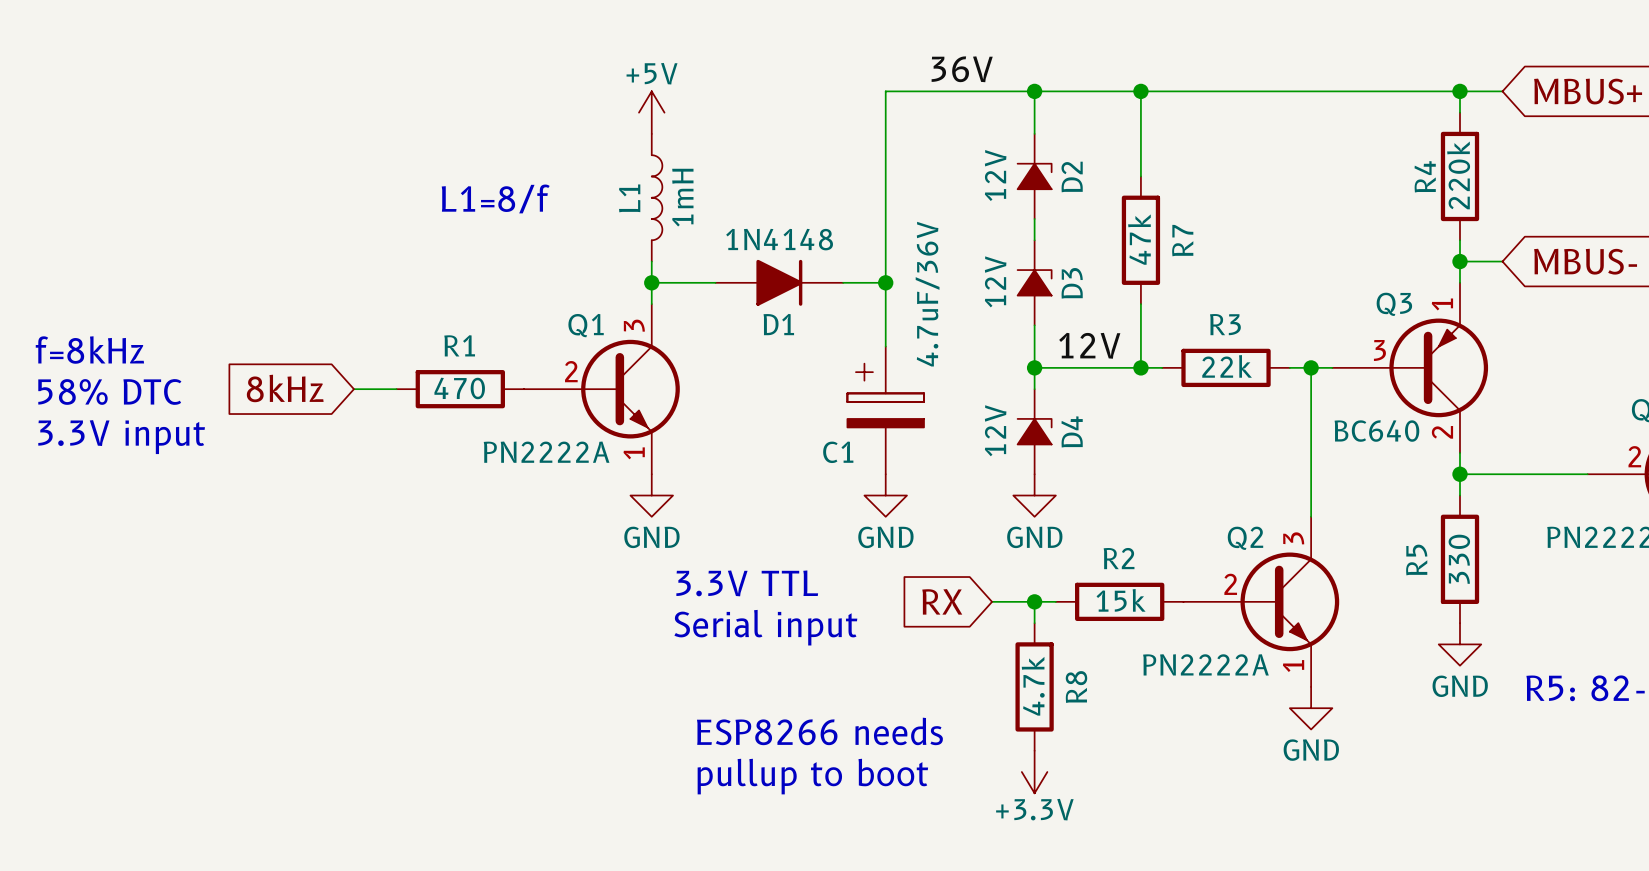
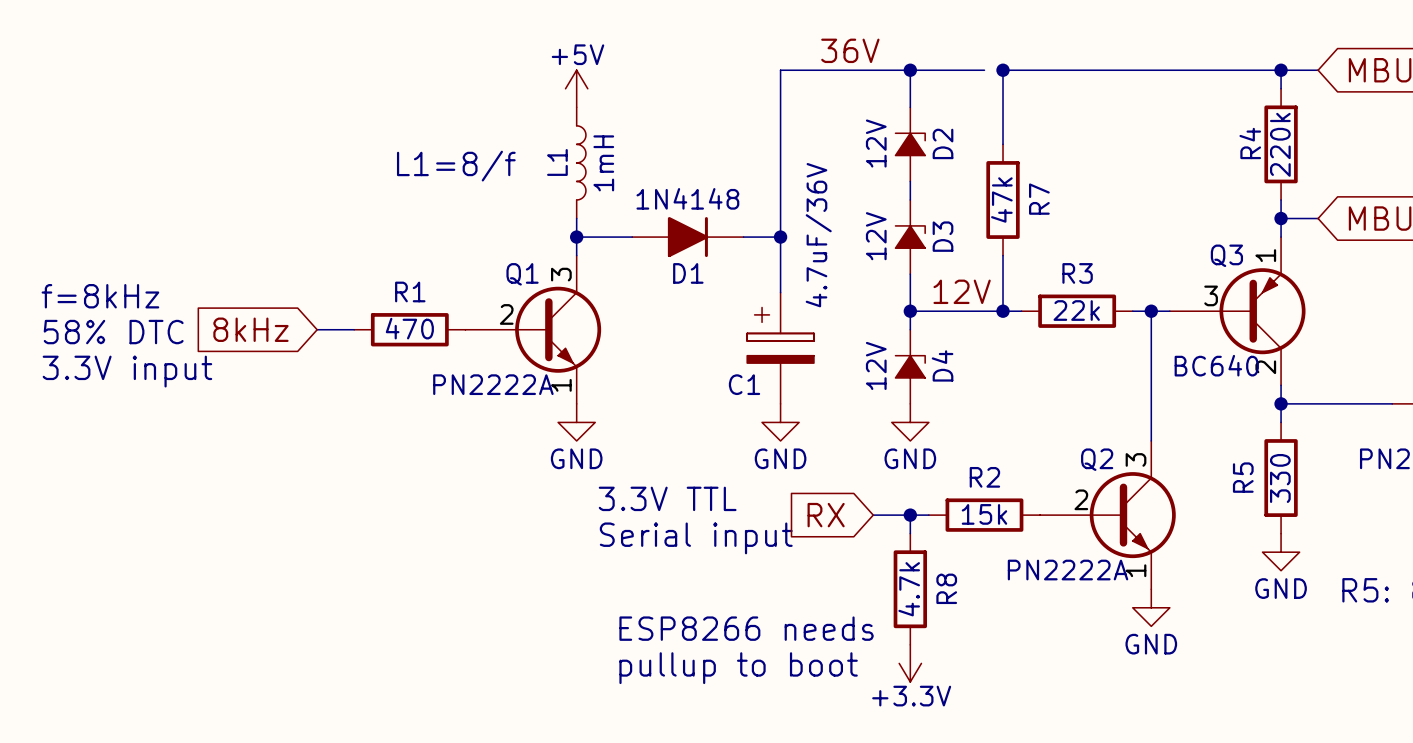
wire: (1119, 91) (1140, 91) -> none

